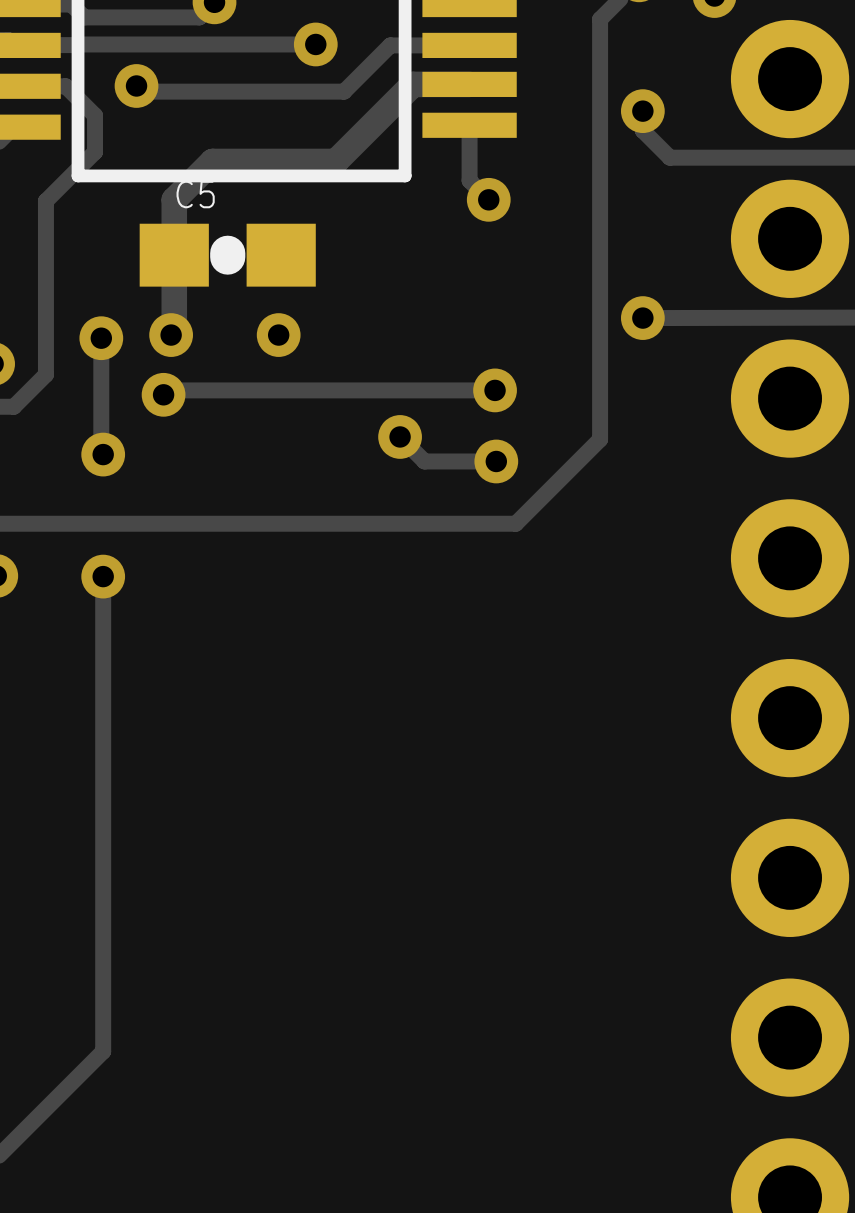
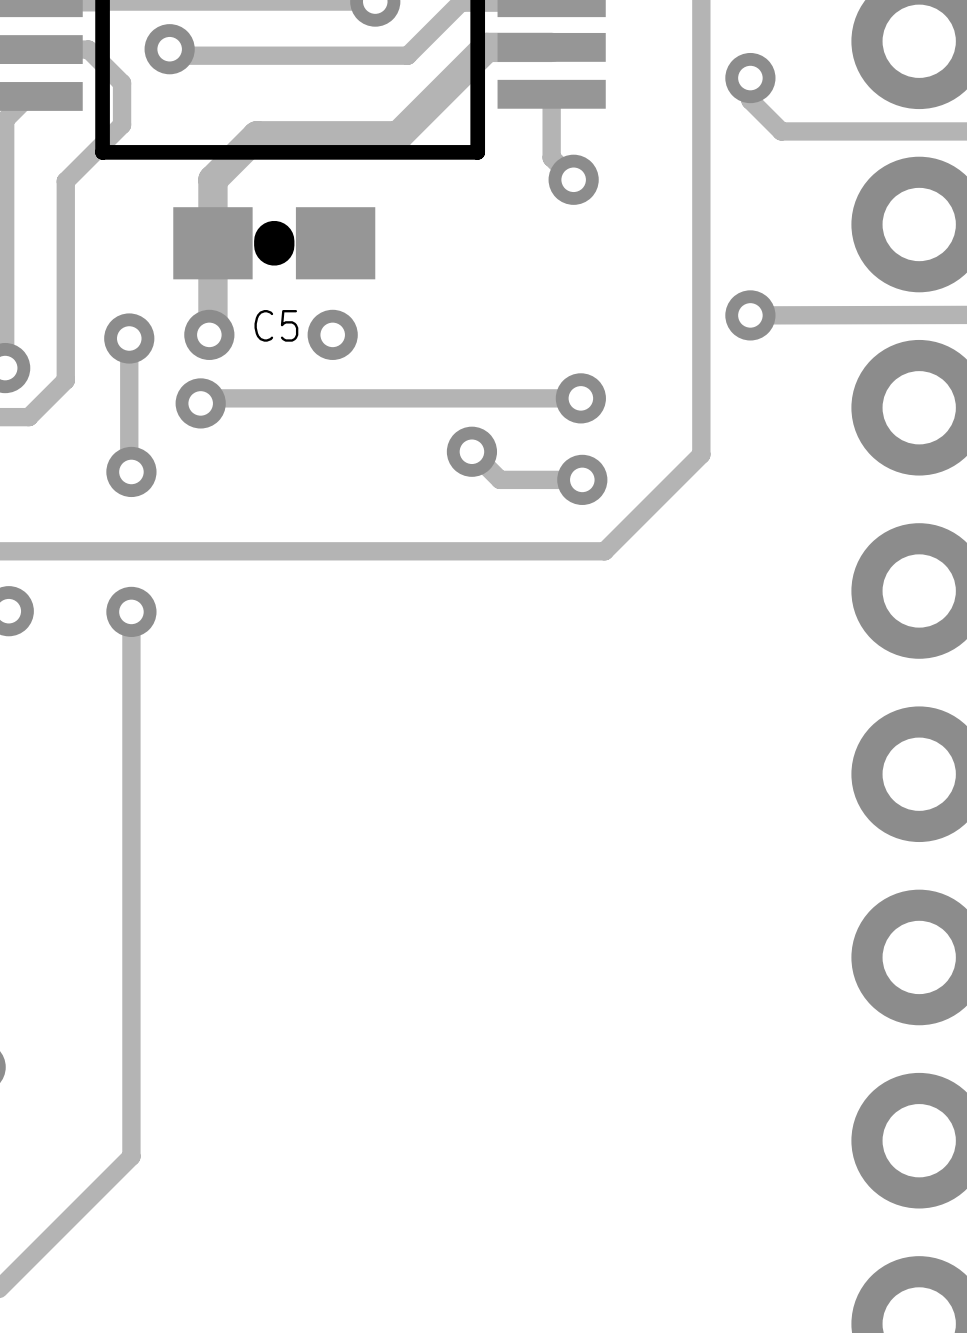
C5 name position: C5 (195, 194) -> C5 (276, 325)

